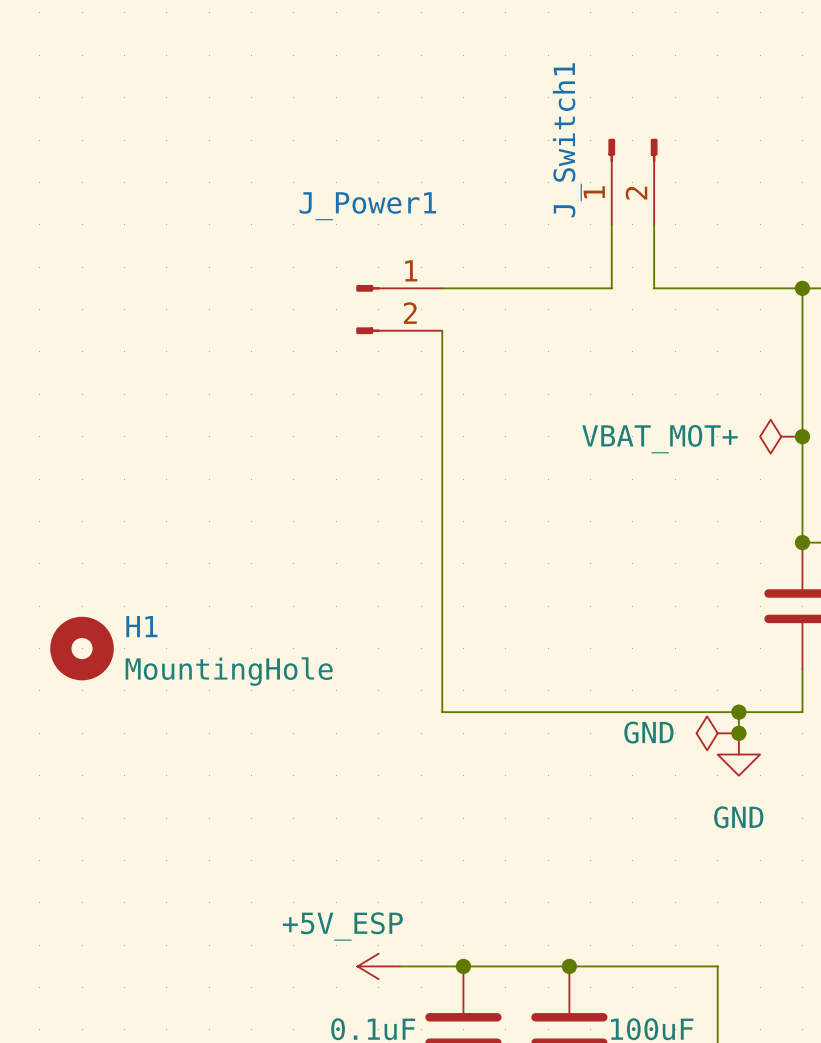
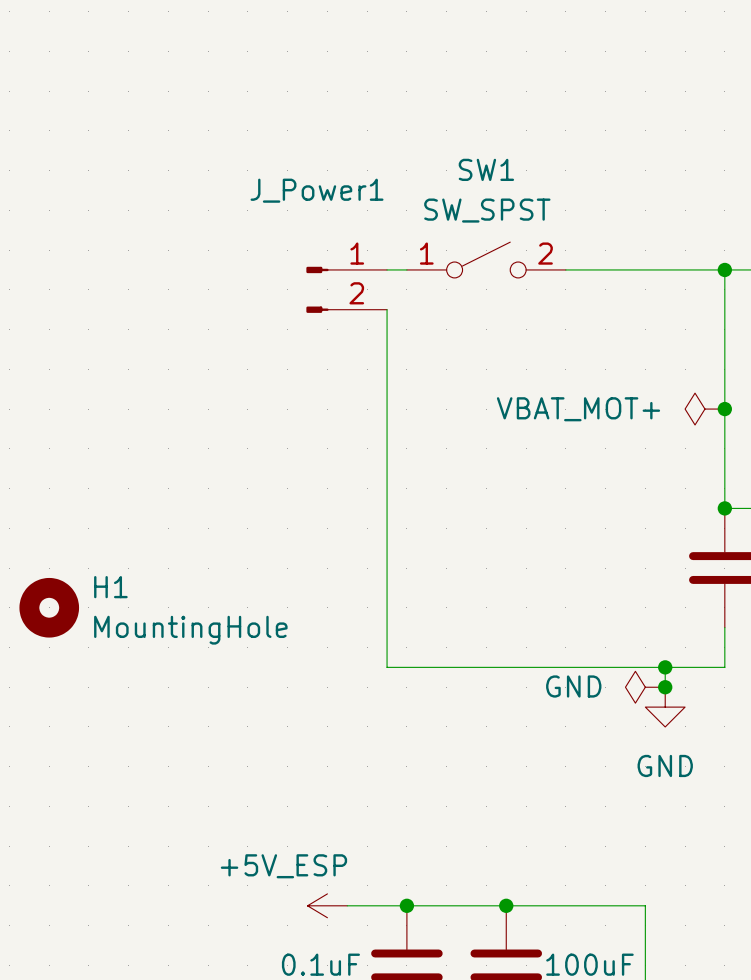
J_Switch1: (632, 181) -> none
wire: (611, 224) (611, 288) (463, 288) -> none
wire: (654, 224) (654, 288) -> (565, 269) (585, 269)
SW1: none -> SW_SPST (486, 260)

